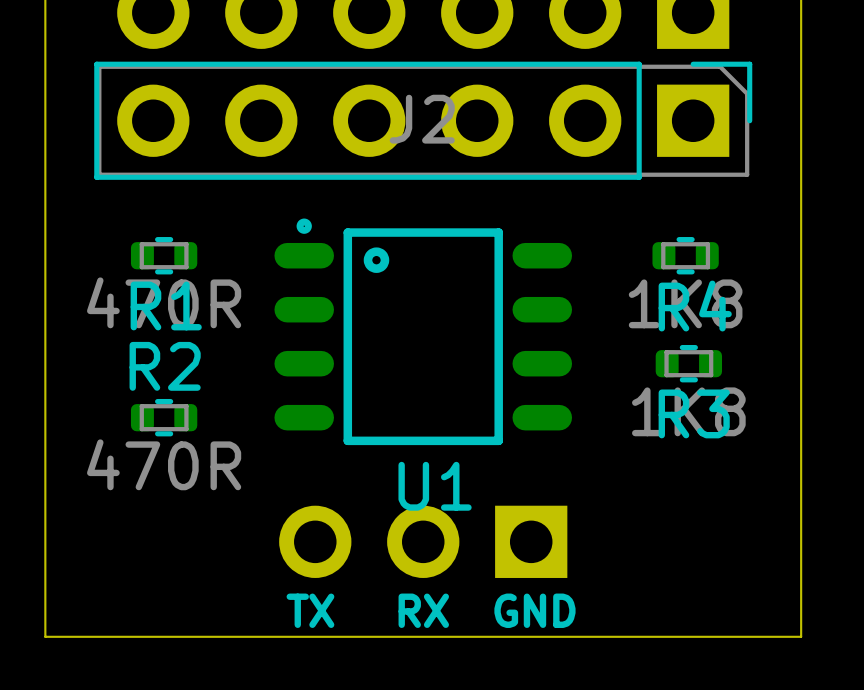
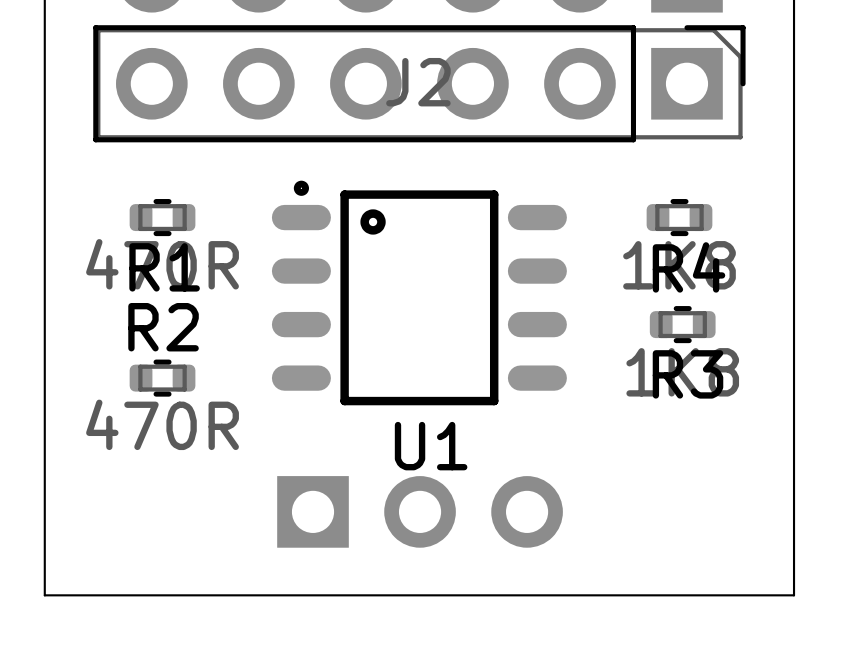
part rotation: 0° (423, 541) -> 180° (420, 511)
text: TX (310, 610) -> none
text: RX (423, 610) -> none
text: GND (534, 610) -> none

